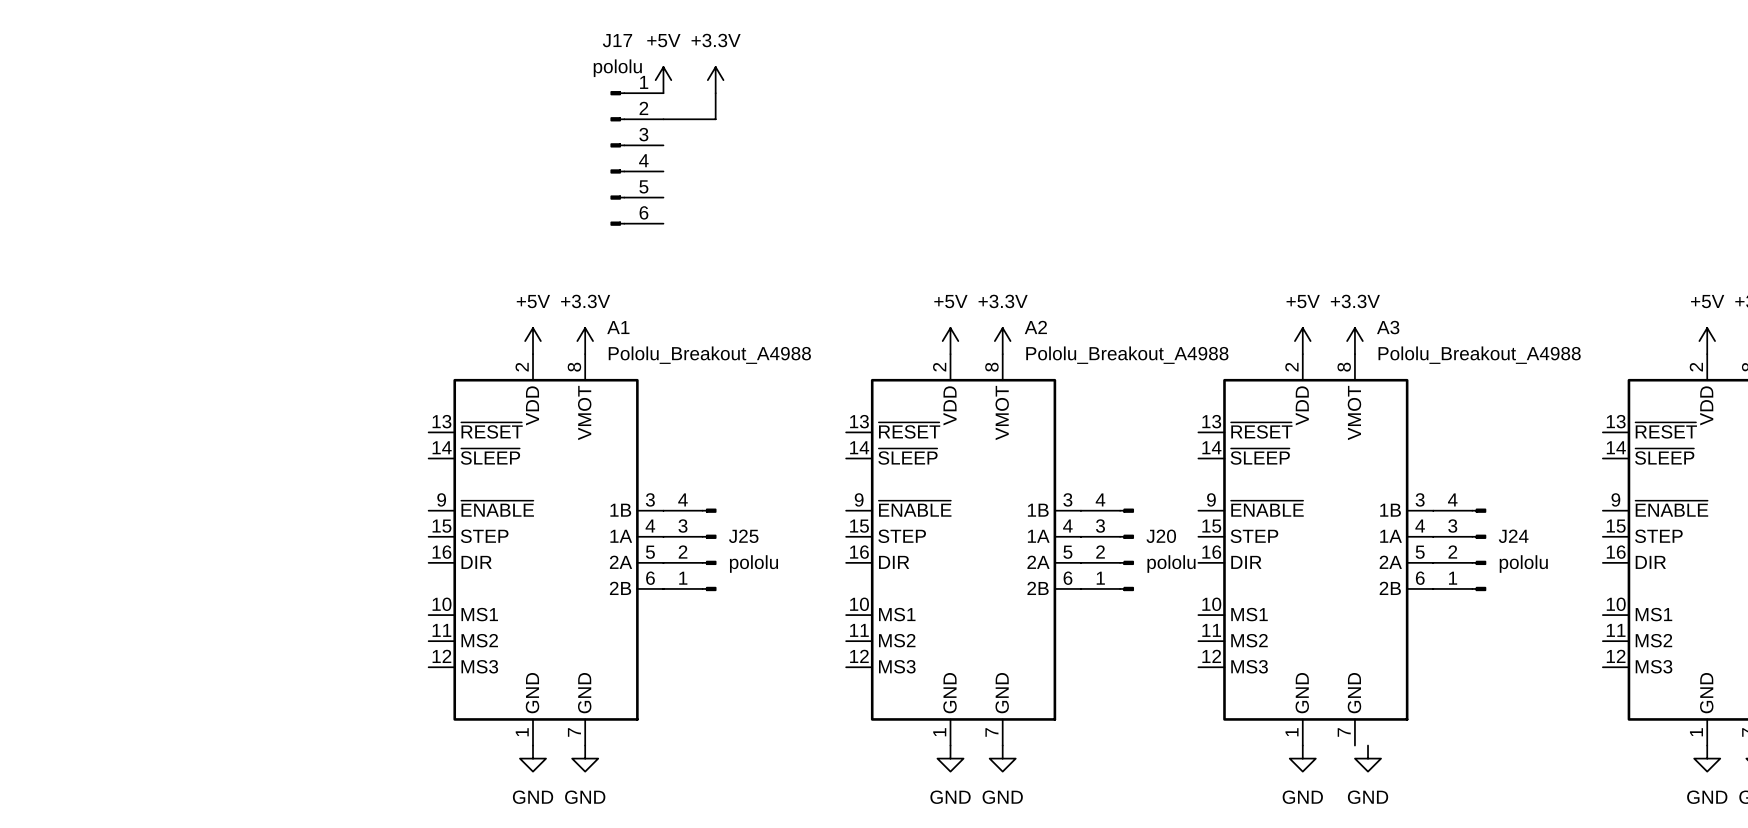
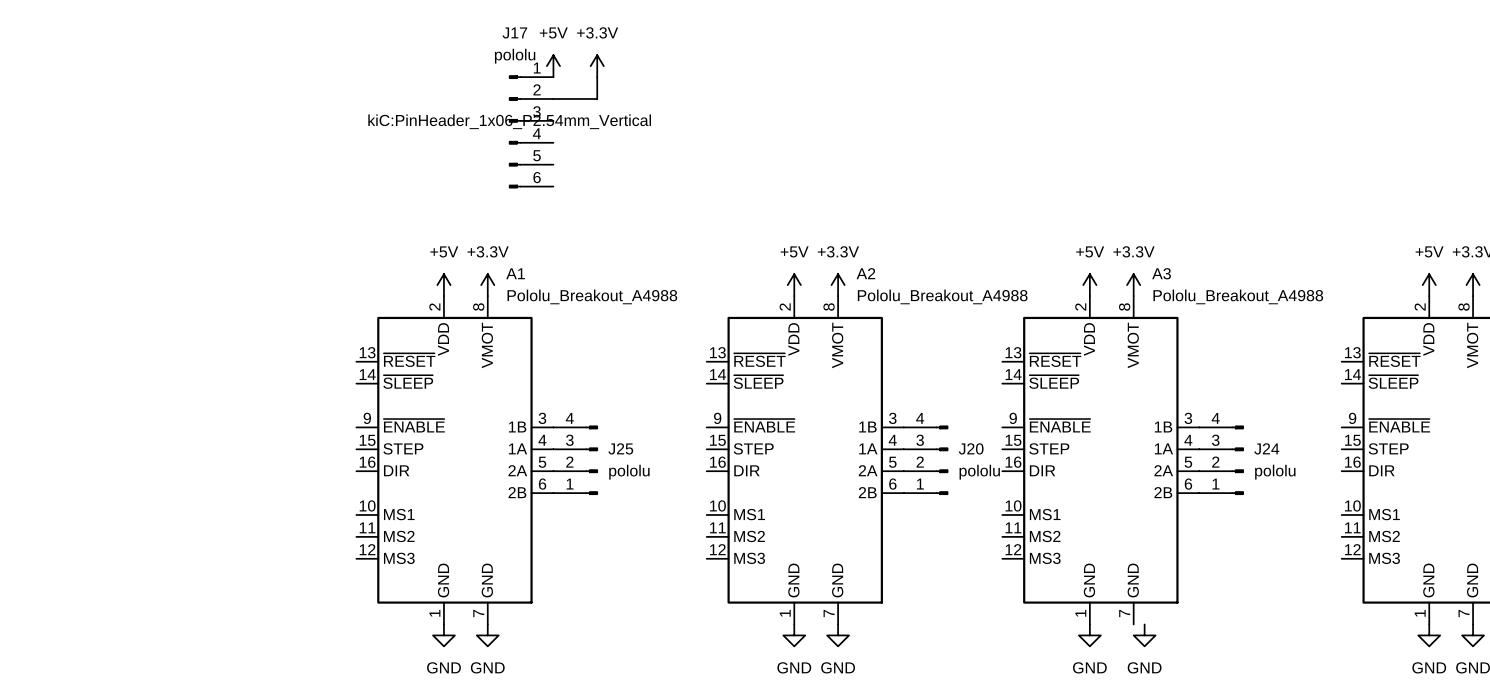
J17 text: none -> kiC:PinHeader_1x06_P2.54mm_Vertical (509, 121)

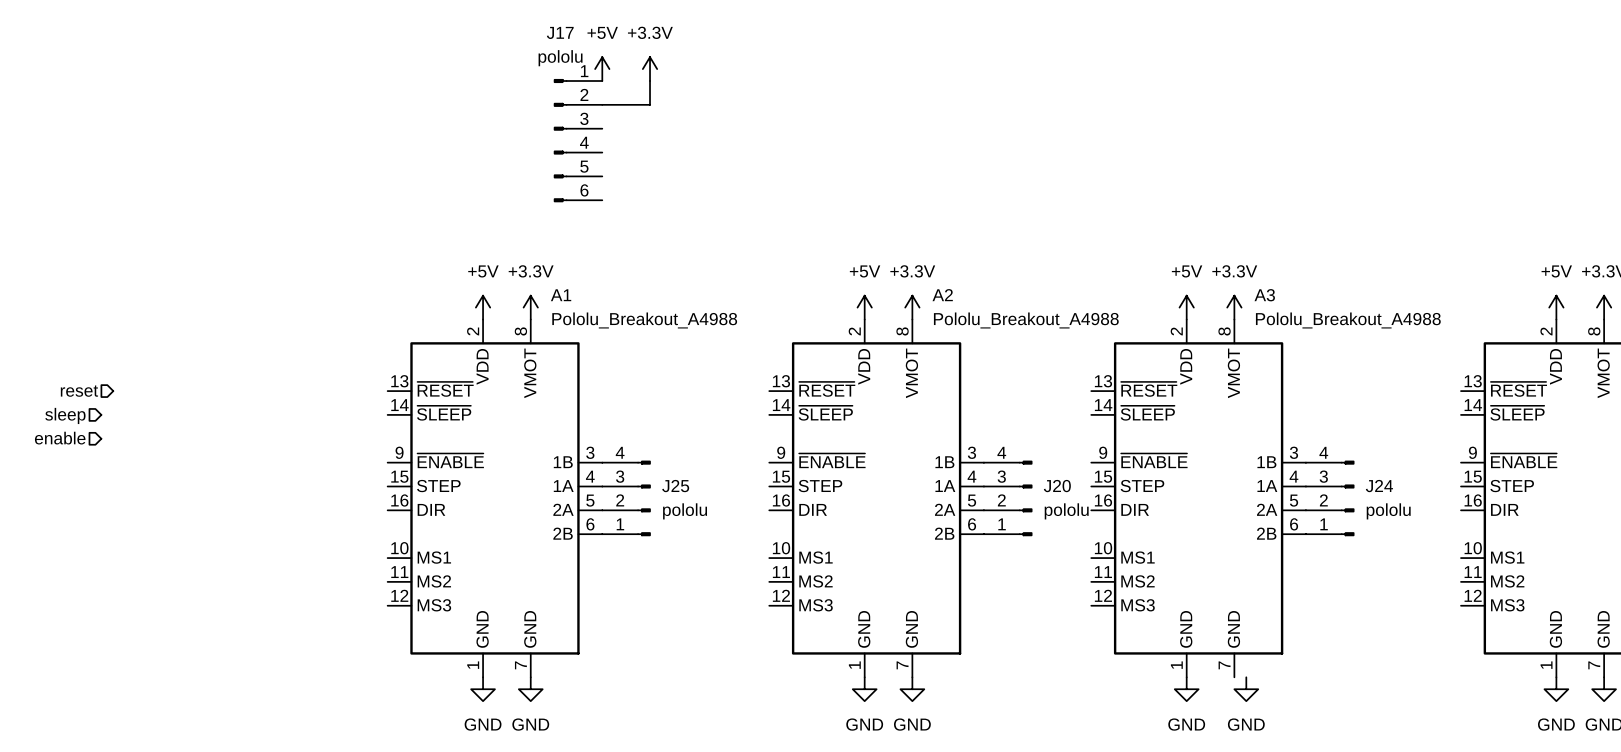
J17 text: kiC:PinHeader_1x06_P2.54mm_Vertical (509, 121) -> none
hierarchical label: none -> reset (79, 391)
hierarchical label: none -> sleep (65, 415)
hierarchical label: none -> enable (60, 438)

